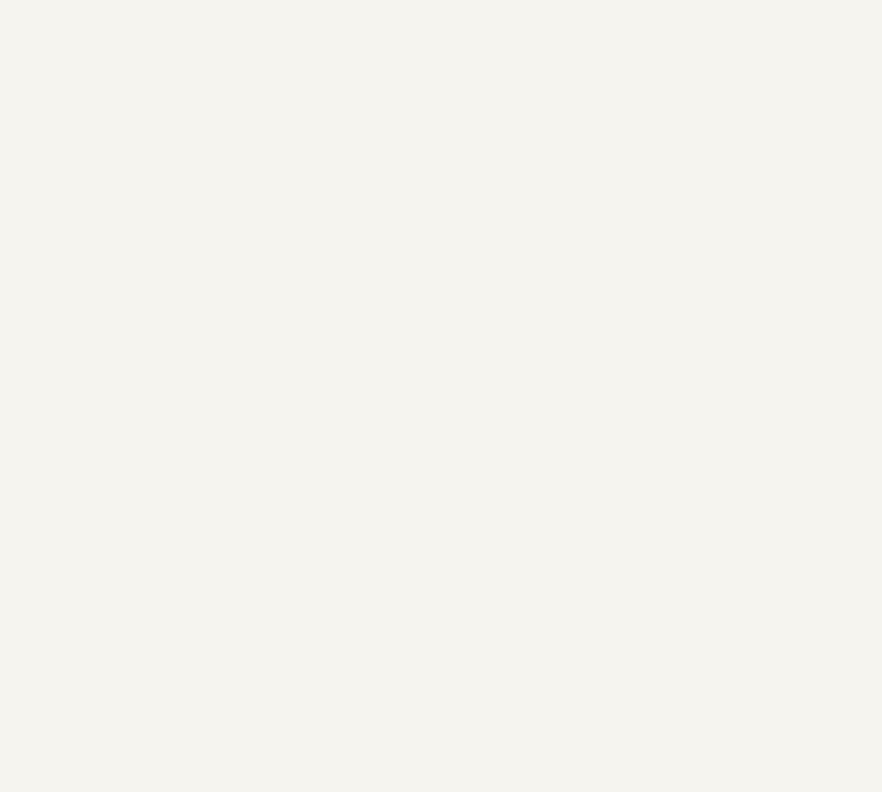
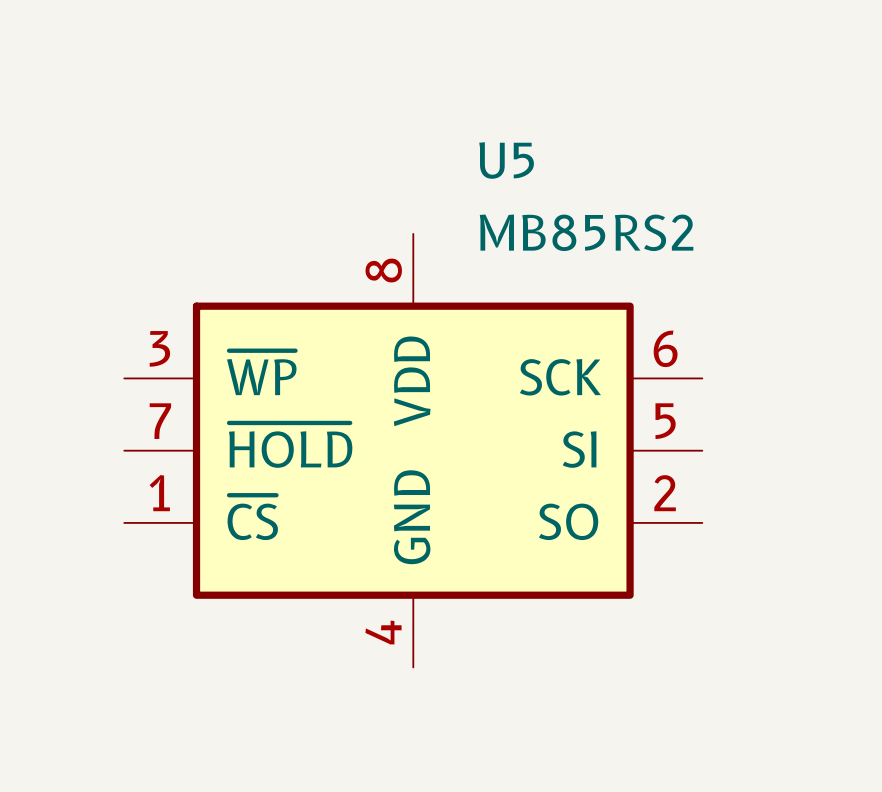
U5: none -> MB85RS2 (413, 450)

